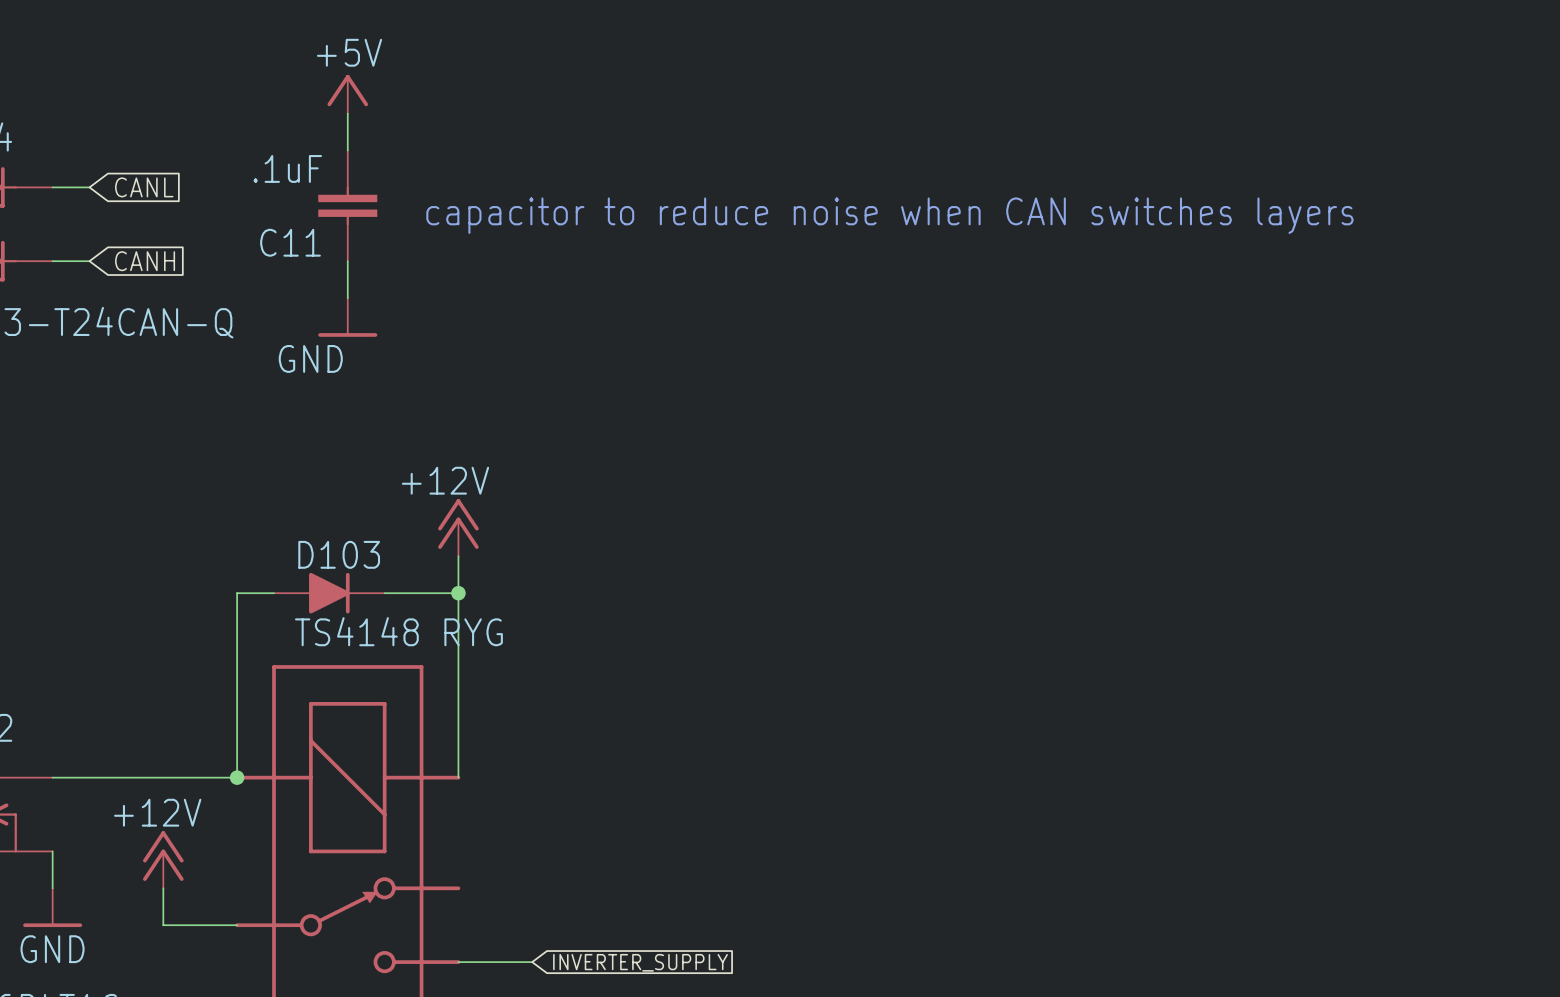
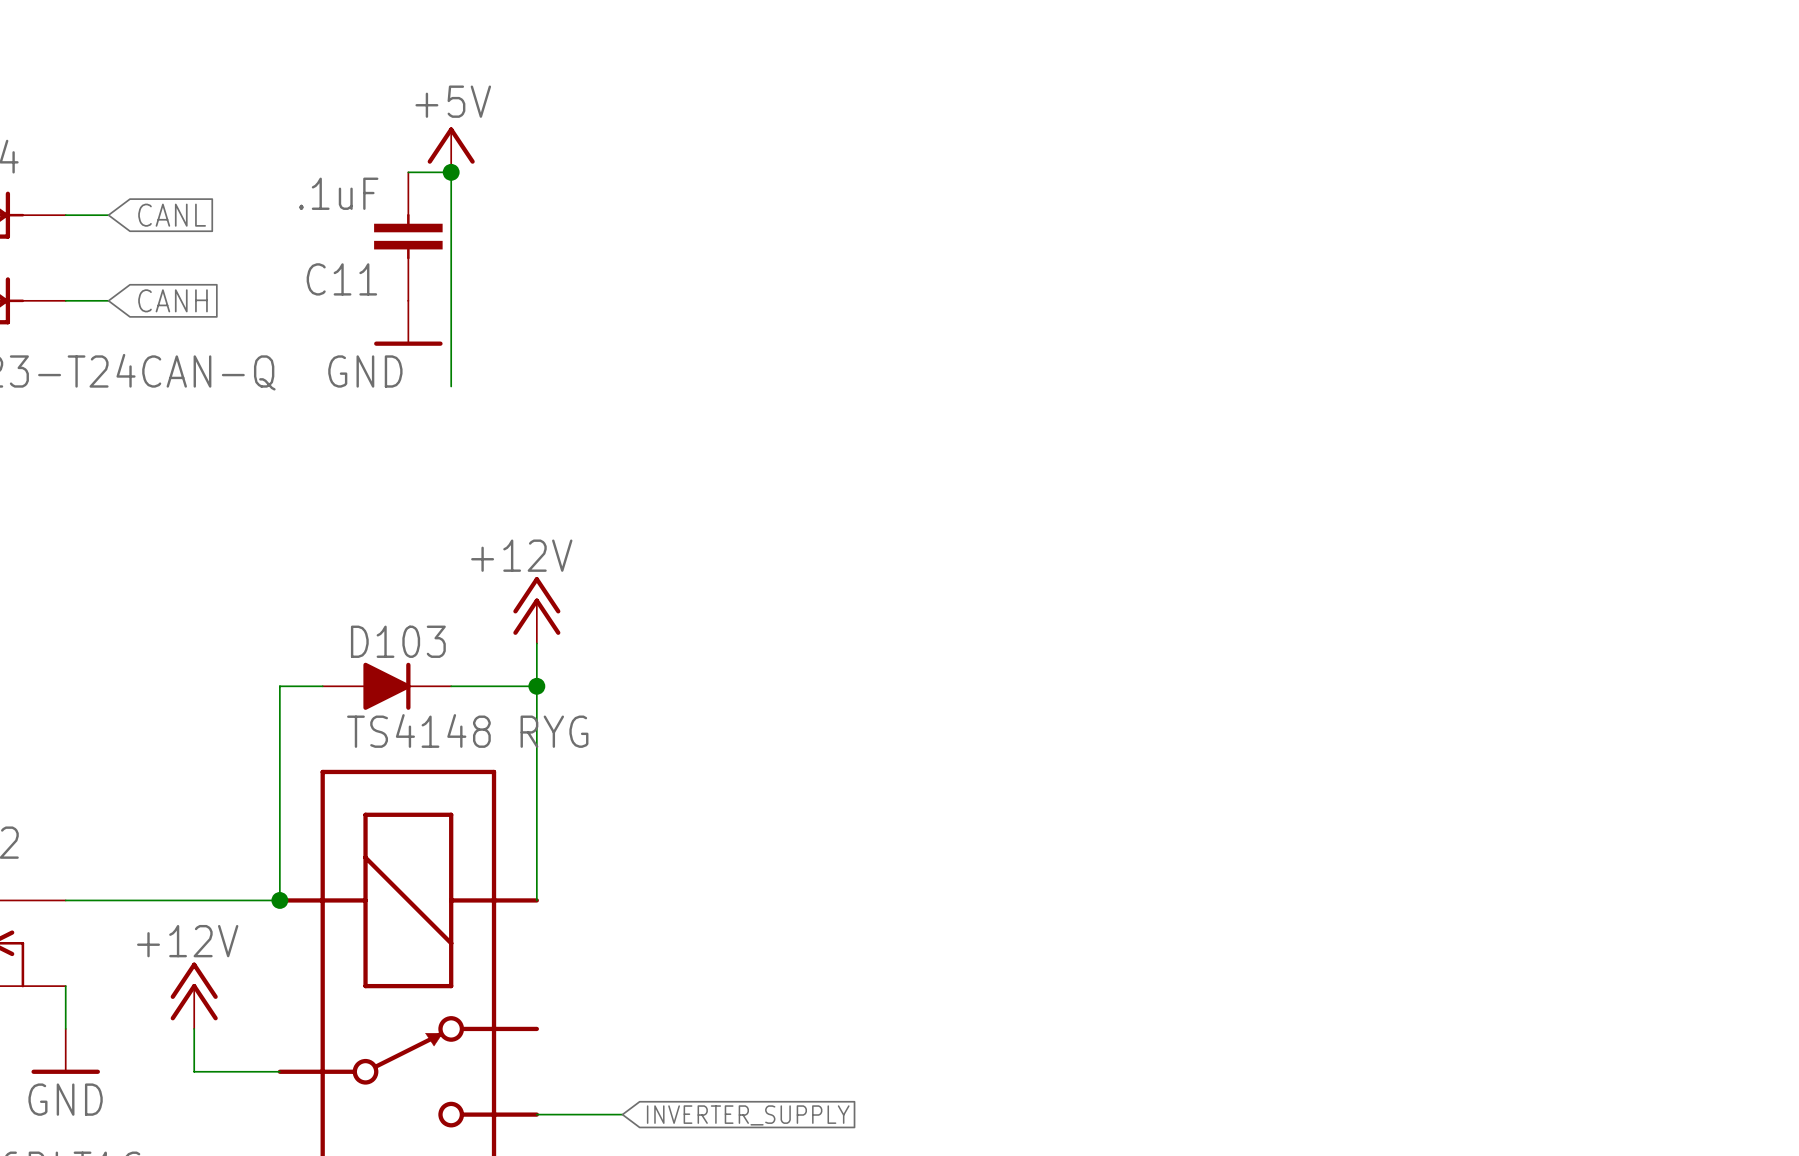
power symbol position: +5V (347, 94) -> +5V (451, 149)
wire: (347, 113) (347, 150) -> (451, 386) (451, 172) (408, 172)
junction: none -> (451, 172)
text: capacitor to reduce noise when CAN switches layers (889, 215) -> none
power symbol position: GND (347, 317) -> GND (408, 323)

